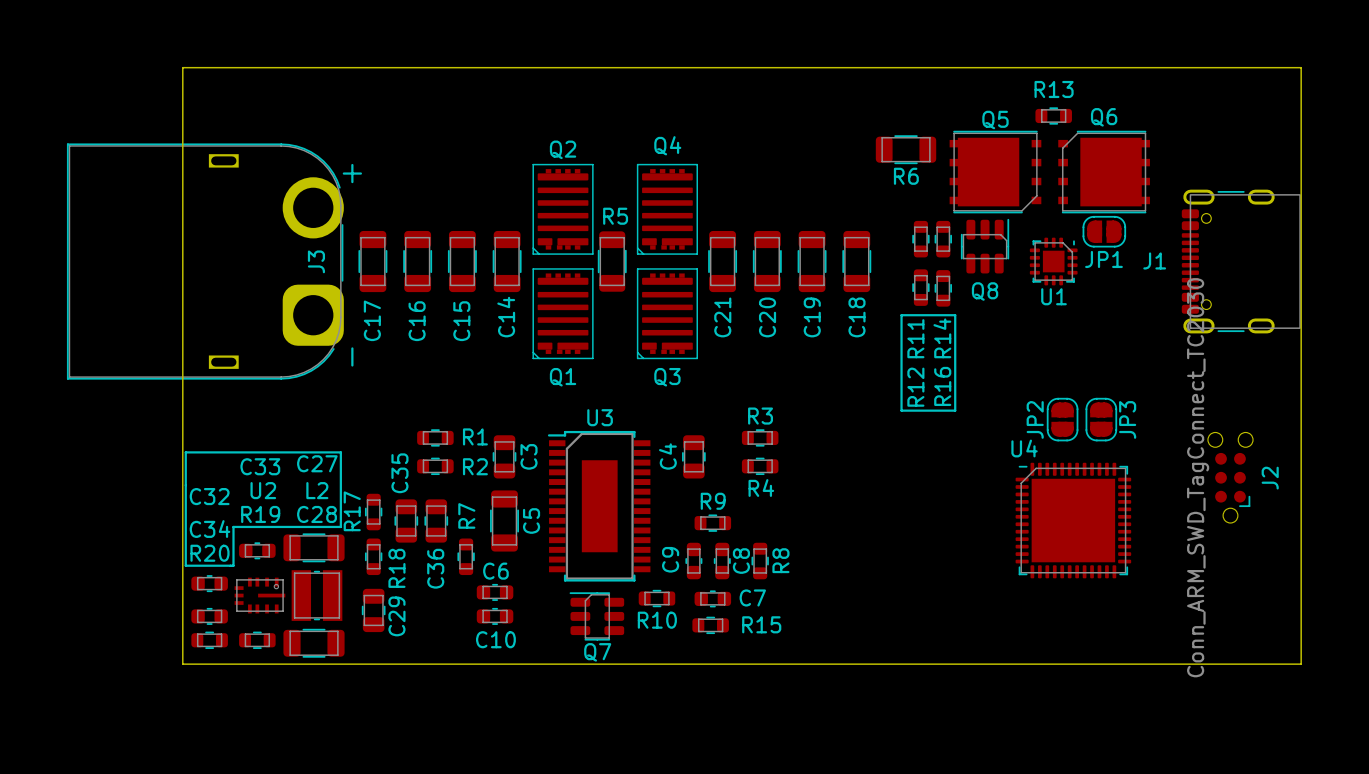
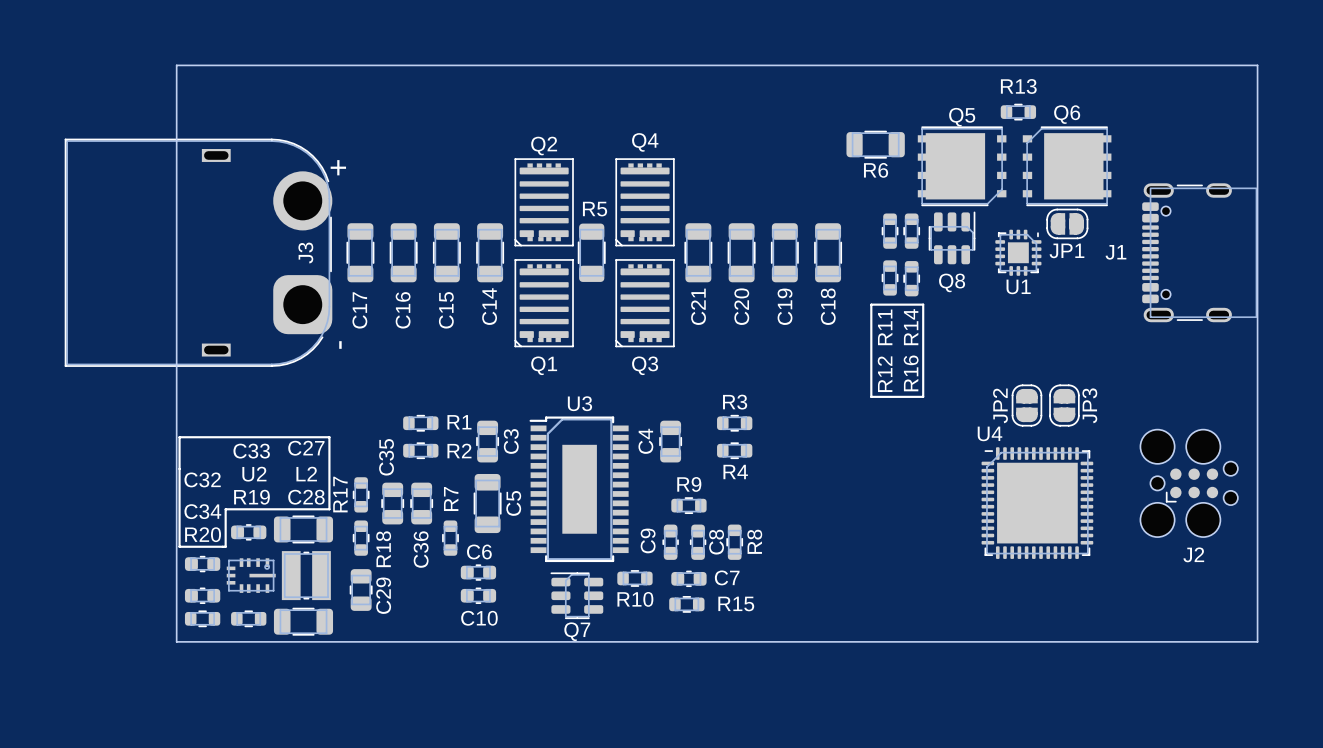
J2 footprint: [1207, 432, 1254, 524] -> [1140, 429, 1238, 538]
J2 value: Conn_ARM_SWD_TagConnect_TC2030 (1198, 477) -> none
J2 name position: J2 (1270, 478) -> J2 (1193, 554)

